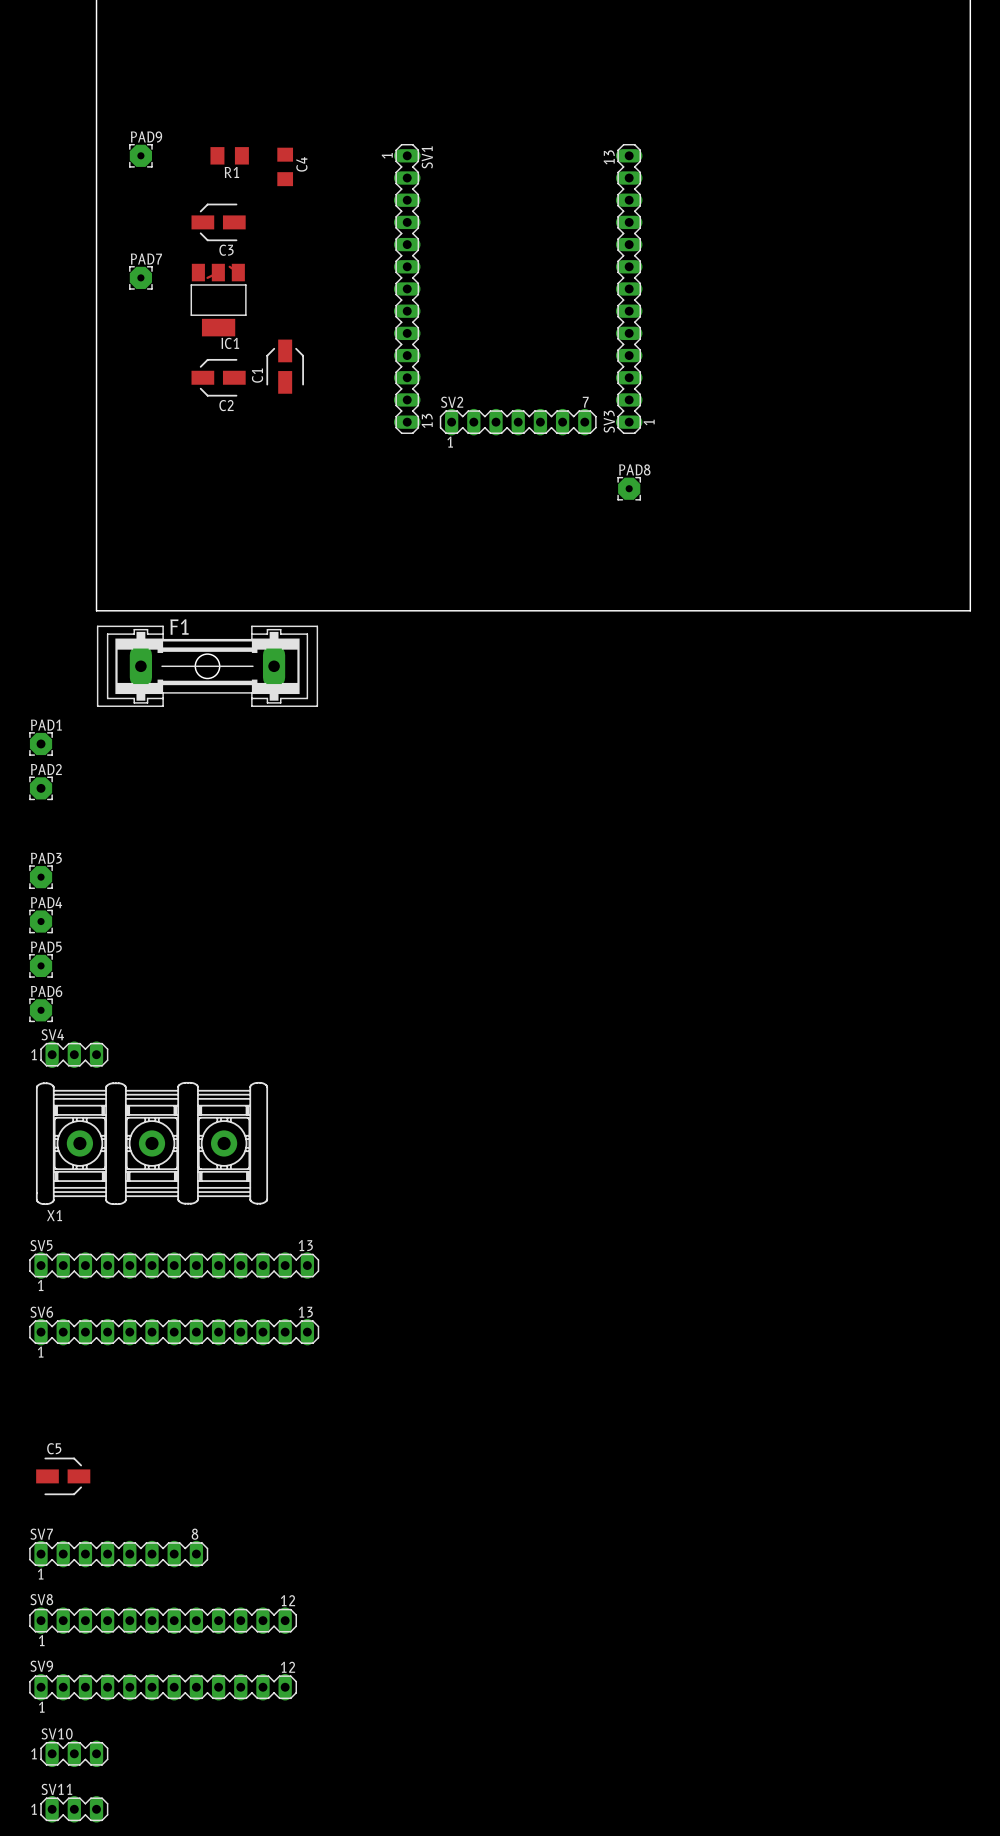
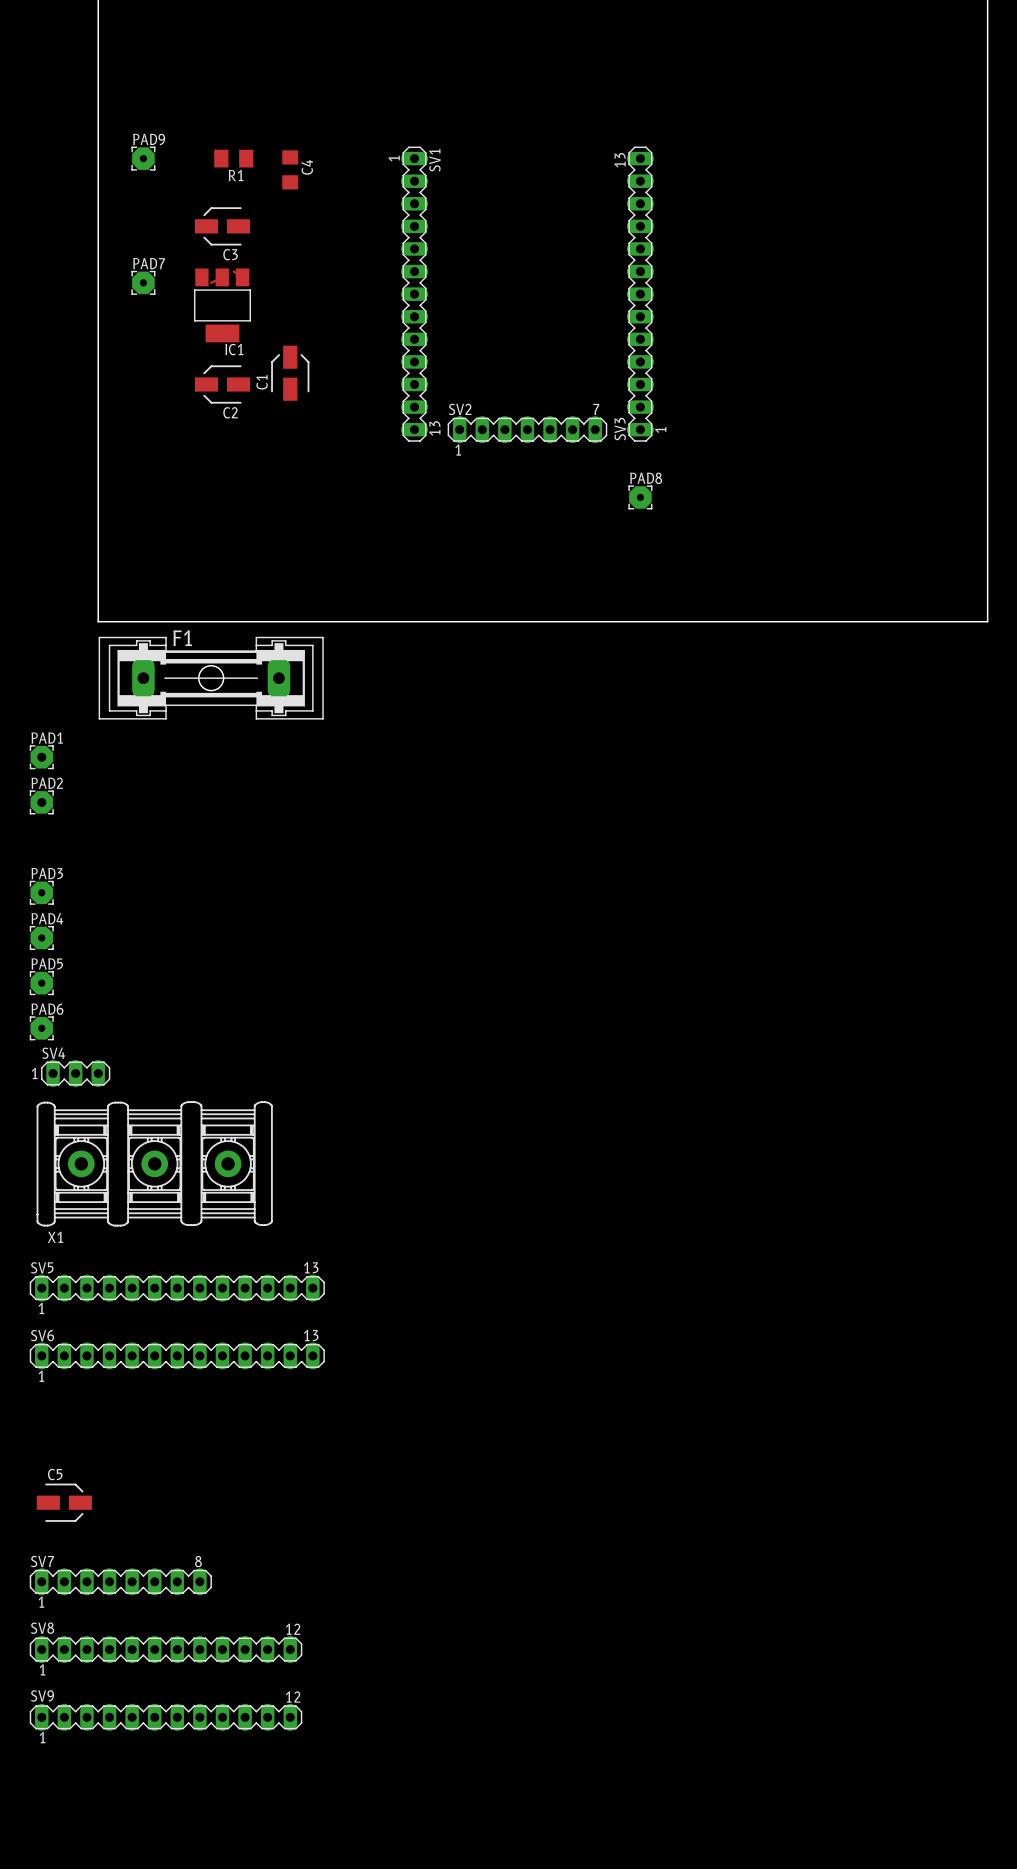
SV10: (74, 1753) -> none
SV11: (74, 1809) -> none

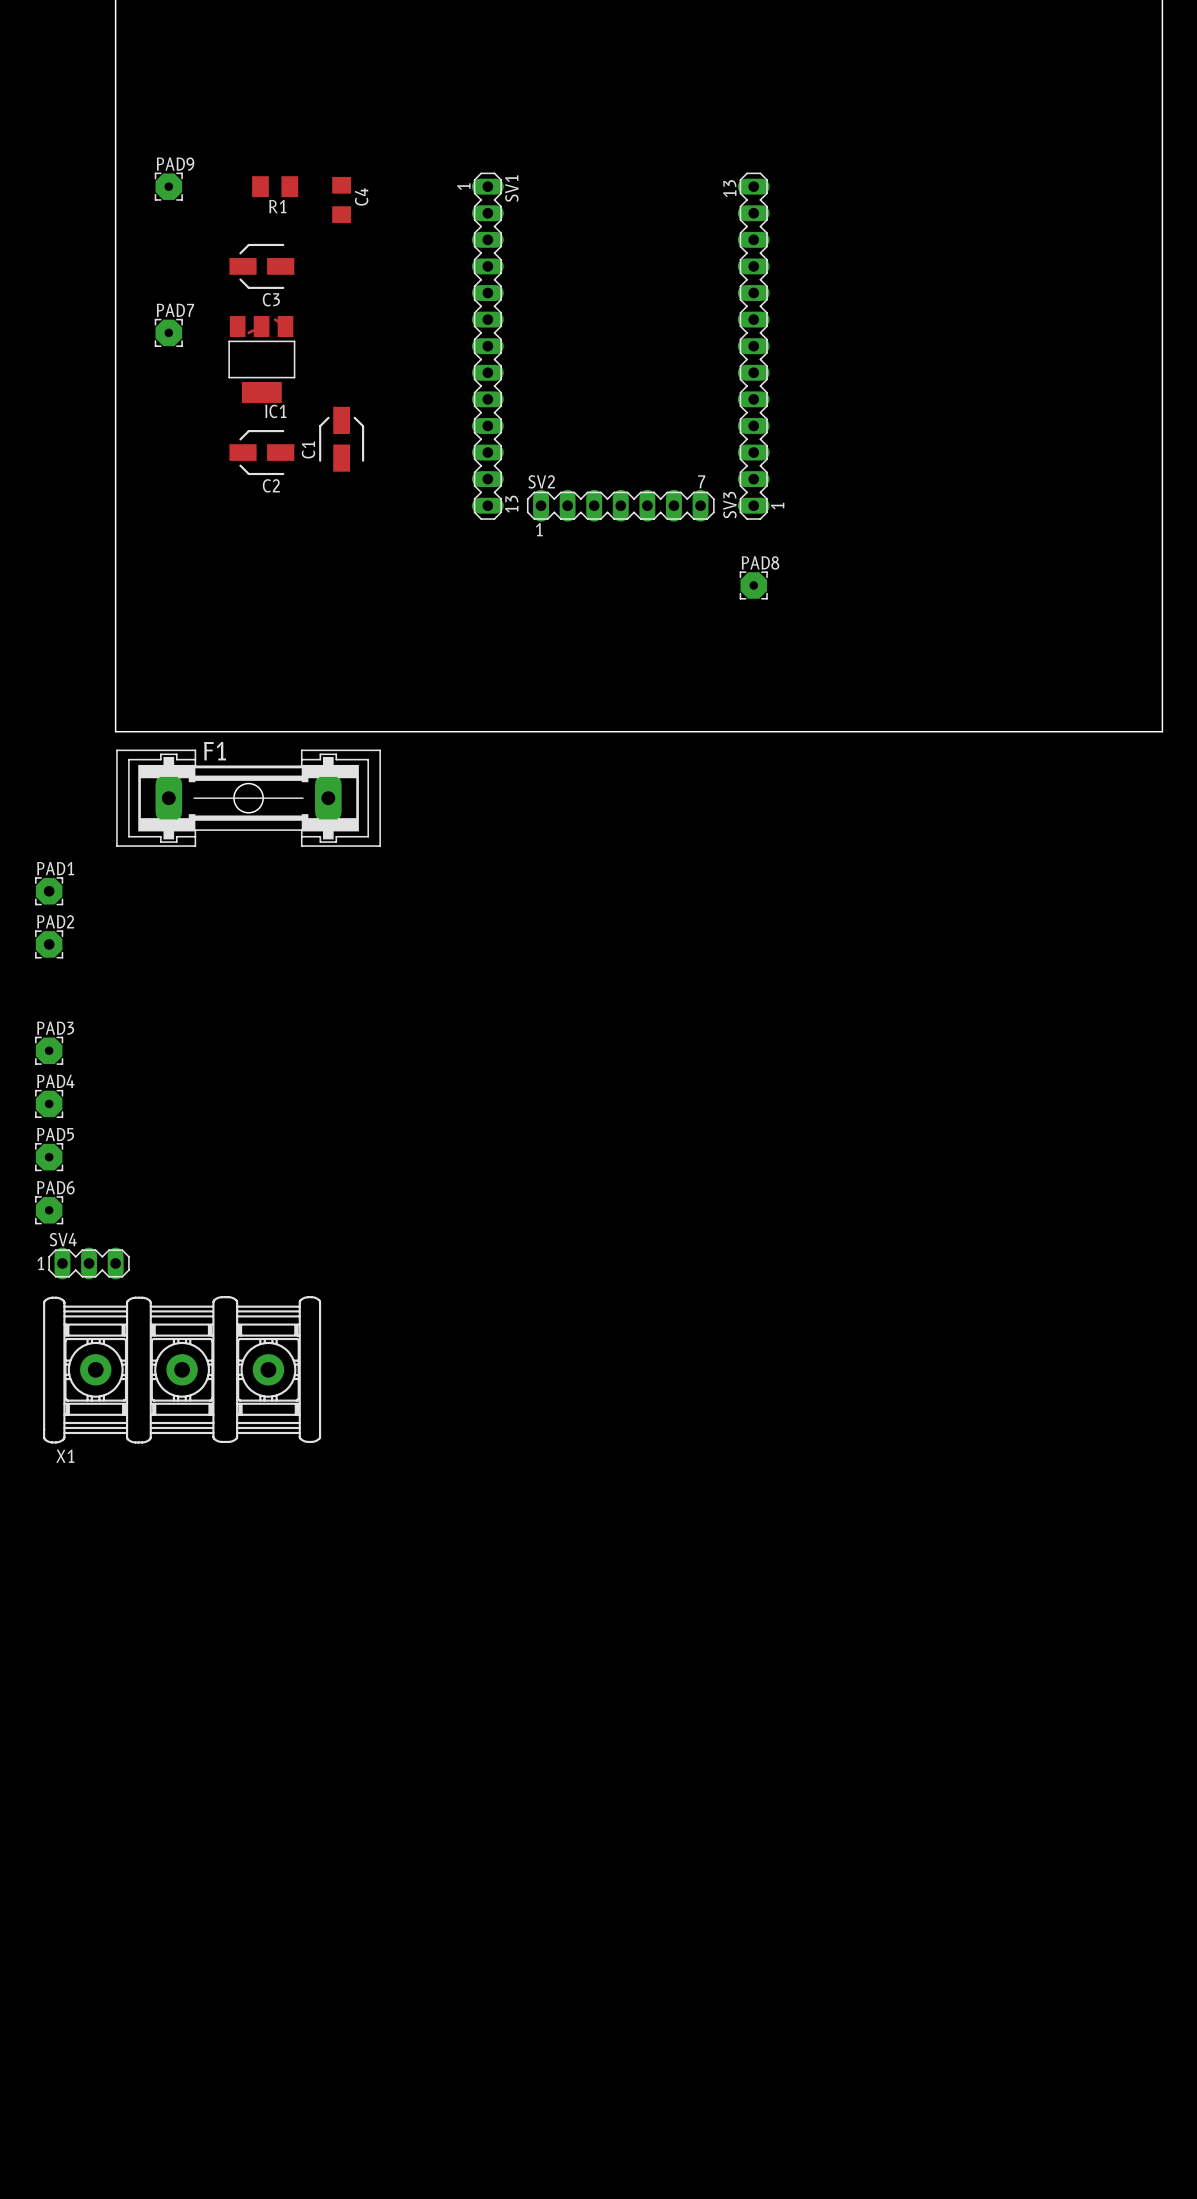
SV5: (177, 1288) -> none
SV6: (177, 1355) -> none
C5: (64, 1502) -> none
SV7: (120, 1581) -> none
SV8: (166, 1649) -> none
SV9: (166, 1717) -> none

